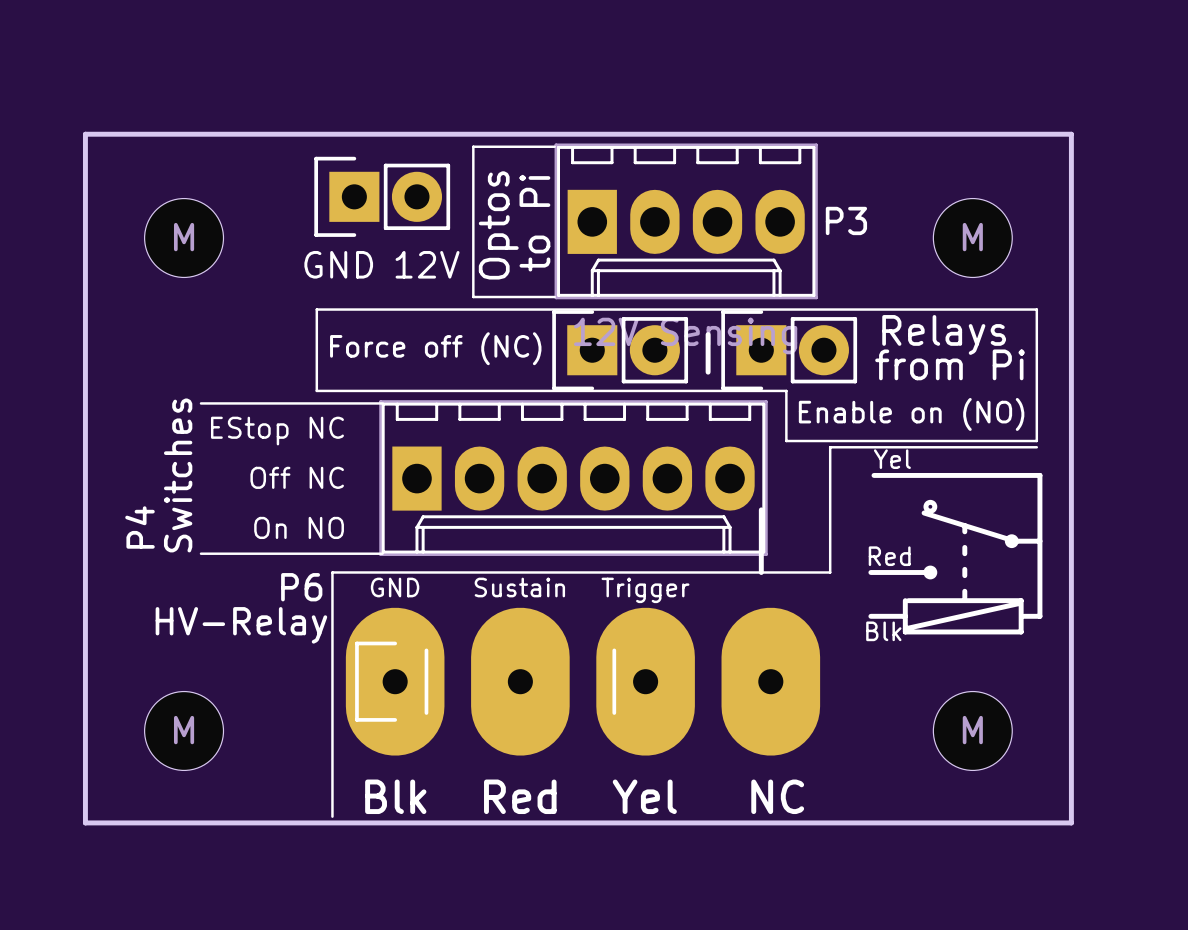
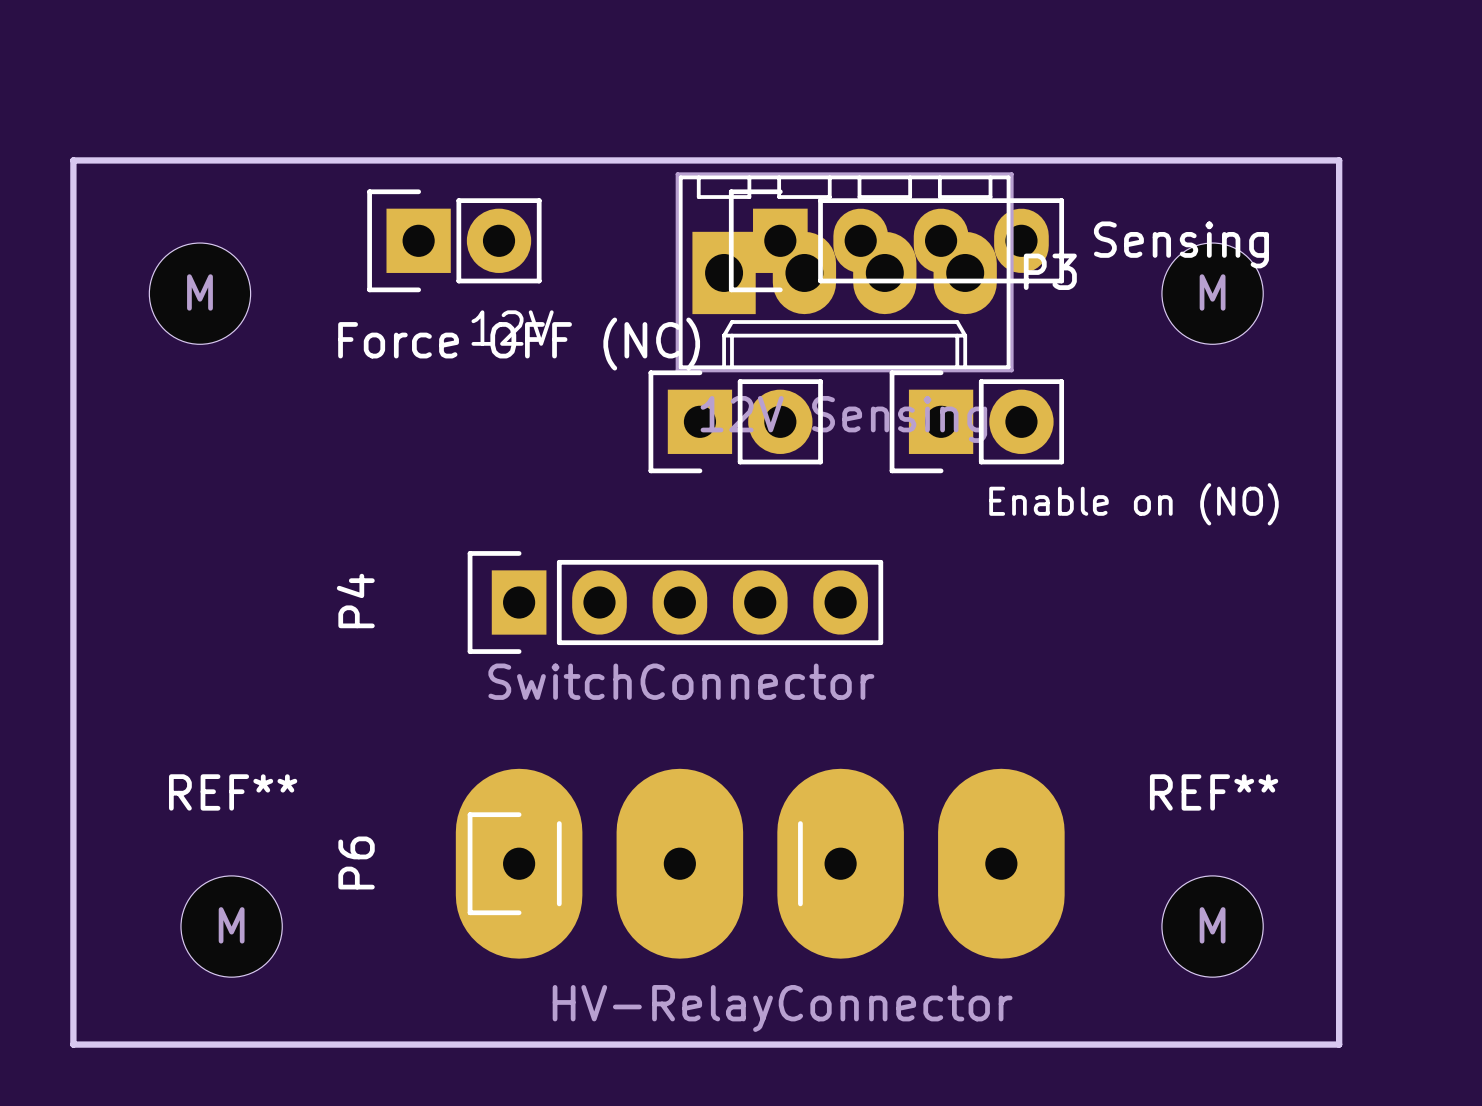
line: (554, 146) (473, 146) (473, 297) (554, 297) -> none
part: none -> Sensing (896, 240)
text: to Pi (534, 223) -> none
text: Optos (498, 225) -> none
text: GND (338, 264) -> none
line: (316, 309) (316, 390) (786, 390) (786, 441) (1036, 441) (1036, 309) (316, 309) -> none
line: (708, 334) (708, 372) -> none
text: Relays (944, 334) -> none
part value: Force off (NC) (435, 348) -> Force OFF (NC) (519, 344)
part position: (620, 350) -> (735, 421)
part position: (789, 350) -> (976, 421)
text: from Pi (949, 364) -> none
P4 footprint: [379, 400, 768, 556] -> [467, 551, 884, 654]
line: (200, 403) (382, 403) -> none
text: EStop NC (277, 431) -> none
line: (1036, 447) (830, 447) (830, 572) (332, 572) (332, 816) -> none
text: Yel (892, 459) -> none
P4 value: Switches (178, 475) -> SwitchConnector (681, 681)
line: (874, 475) (1039, 475) (1039, 616) (1024, 616) -> none
text: Off NC (297, 477) -> none
drawing: [923, 499, 938, 514] -> none
line: (761, 509) (761, 572) -> none
line: (924, 513) (1014, 541) -> none
line: (964, 525) (964, 531) -> none
P4 name position: P4 (139, 527) -> P4 (355, 601)
text: On NO (299, 527) -> none
drawing: [1004, 534, 1019, 549] -> none
line: (1011, 541) (1039, 541) -> none
line: (964, 547) (964, 553) -> none
line: (200, 553) (382, 553) -> none
text: Red (889, 556) -> none
drawing: [923, 565, 938, 580] -> none
line: (964, 569) (964, 575) -> none
line: (870, 572) (930, 572) -> none
P6 name rotation: 0° (301, 587) -> 90° counterclockwise (356, 862)
P6 name position: P6 (301, 587) -> P6 (356, 862)
text: GND (395, 587) -> none
text: Sustain (519, 587) -> none
text: Trigger (645, 590) -> none
line: (964, 591) (964, 597) -> none
line: (905, 600) (905, 631) (1021, 631) (1021, 600) (908, 600) -> none
line: (1018, 603) (905, 628) -> none
line: (870, 616) (905, 616) -> none
P6 value: HV-Relay (241, 625) -> HV-RelayConnector (782, 1008)
REF** name: none -> REF** (233, 792)
REF** name: none -> REF** (1214, 792)
text: Blk (883, 631) -> none
P6 position: (582, 681) -> (760, 863)
REF** position: (184, 730) -> (231, 926)
text: Blk (395, 796) -> none
text: Red (520, 796) -> none
text: Yel (644, 796) -> none
text: NC (777, 796) -> none

